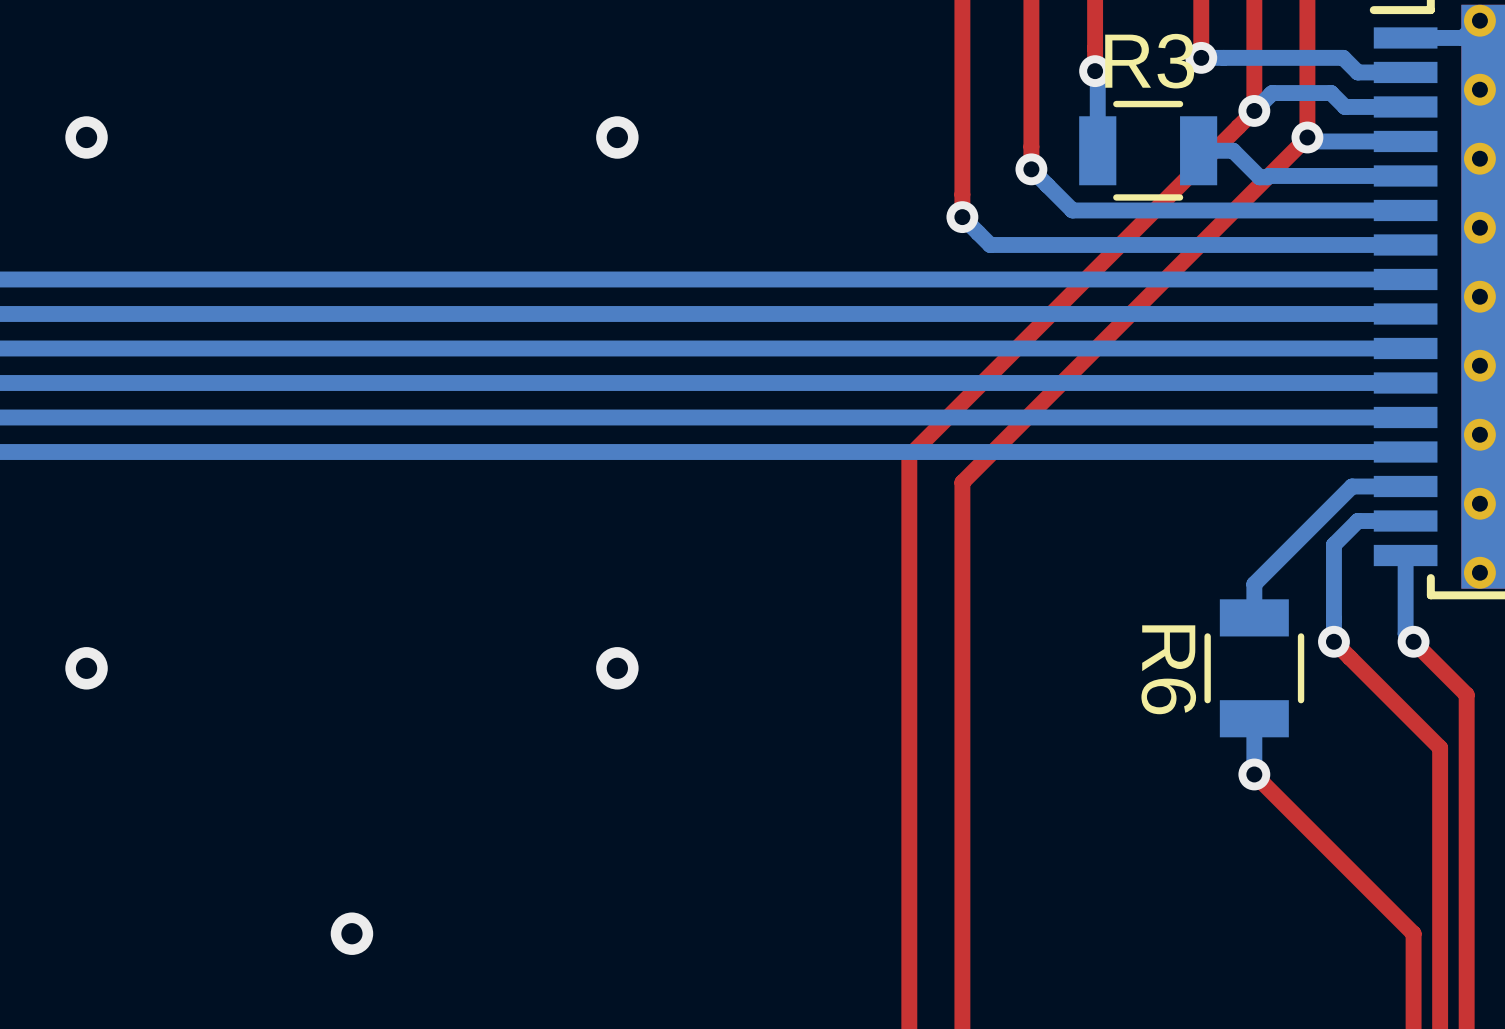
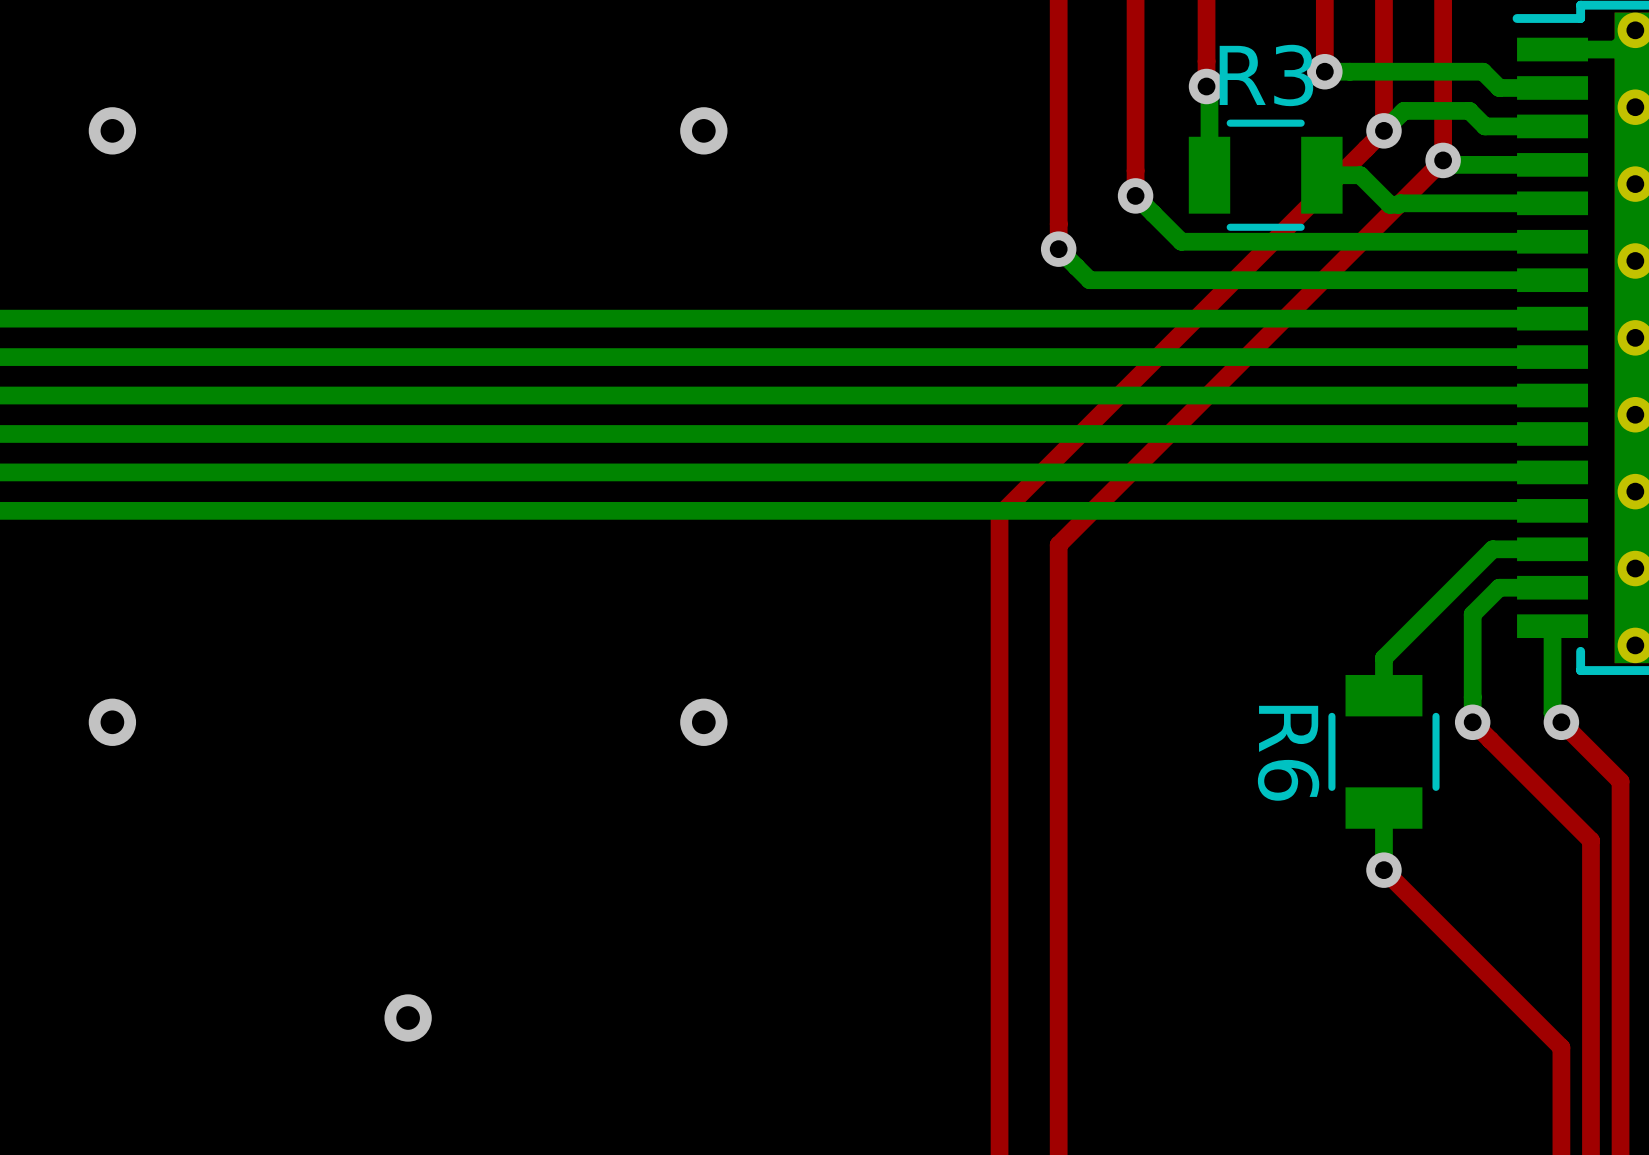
via position: (86, 137) -> (112, 130)
via position: (617, 137) -> (703, 130)
via position: (86, 668) -> (112, 722)
via position: (617, 668) -> (703, 722)
via position: (351, 933) -> (408, 1018)

